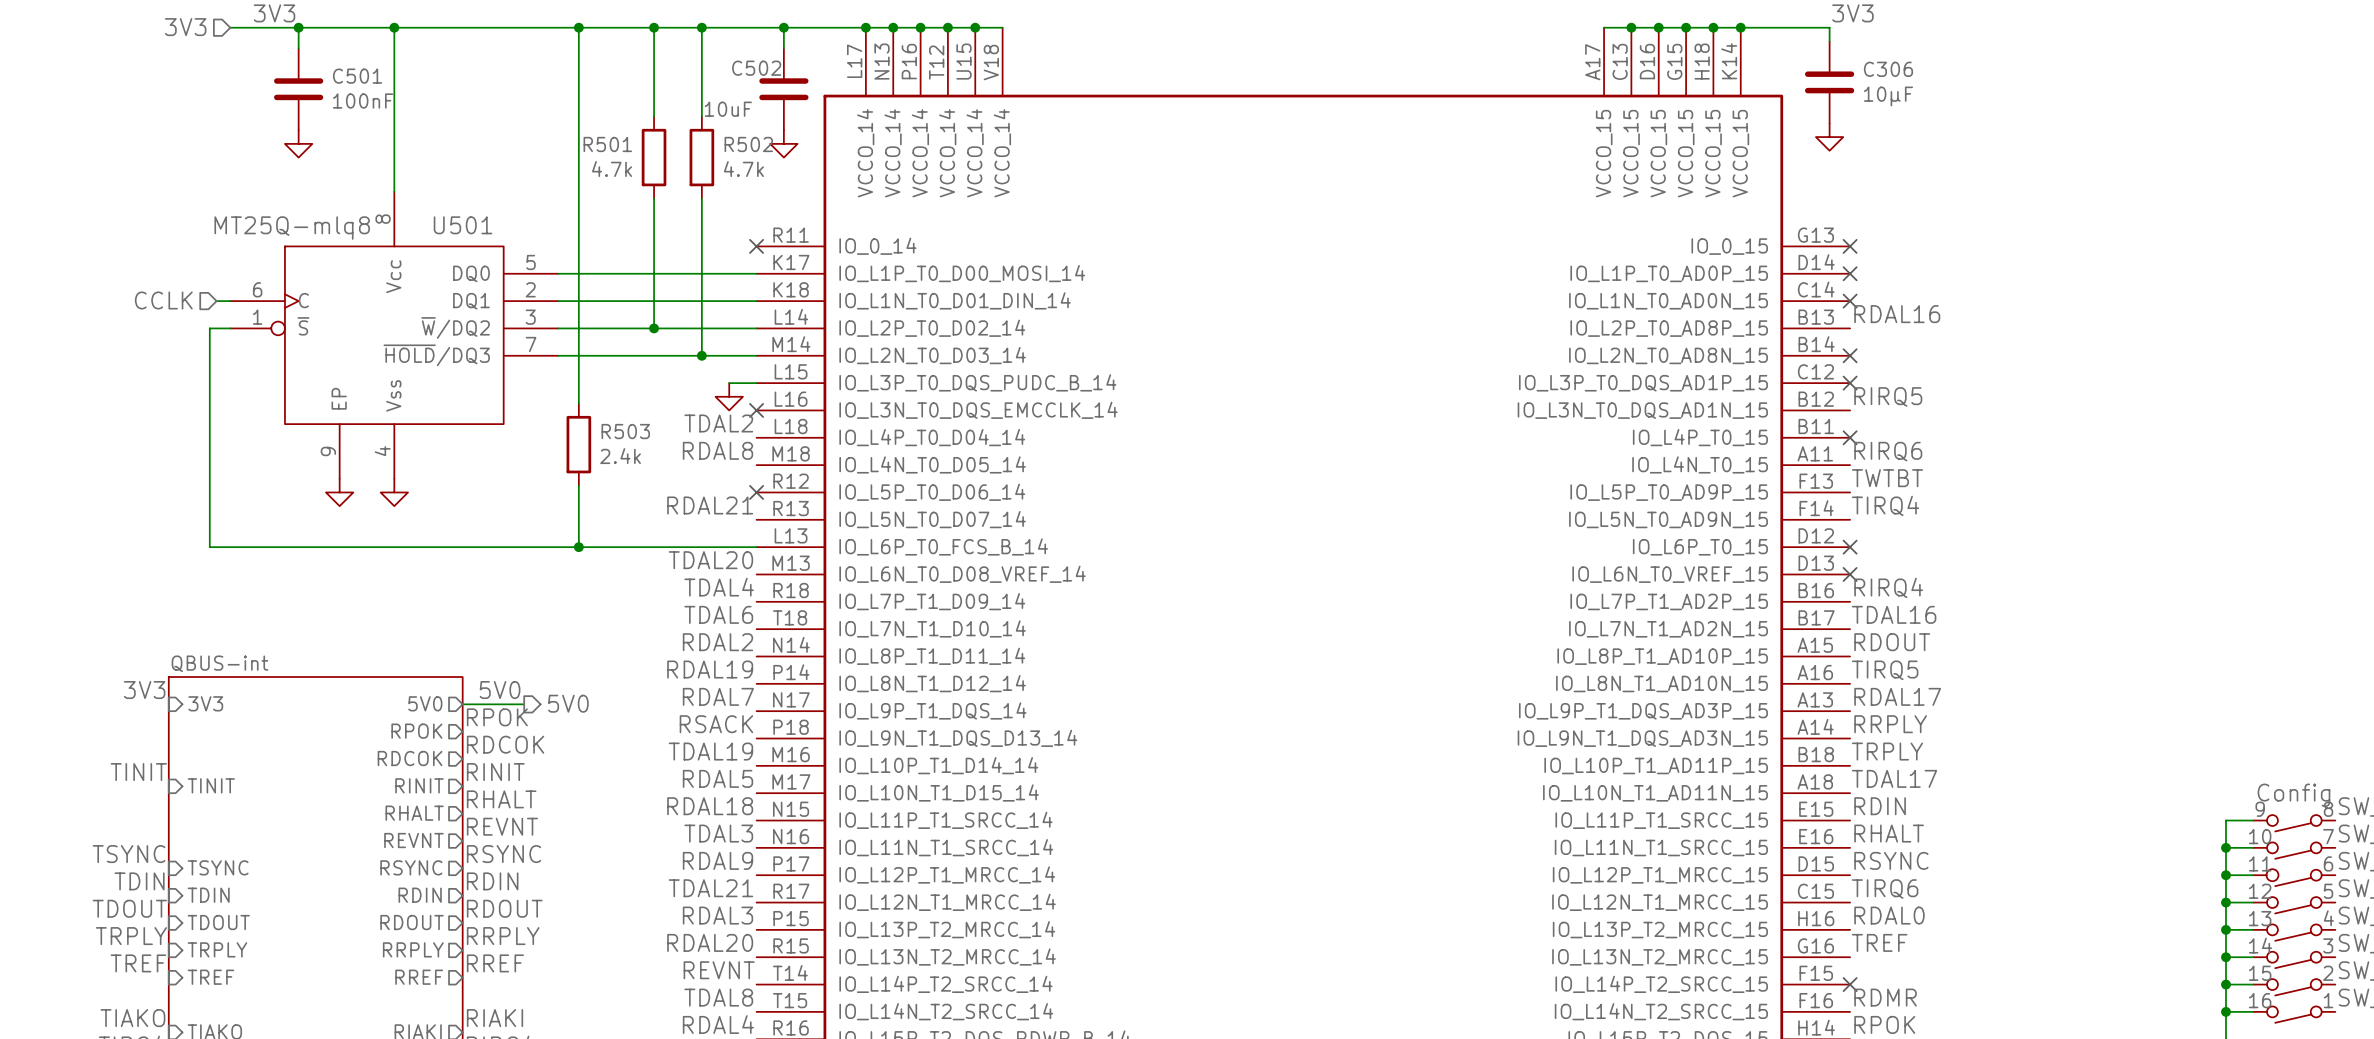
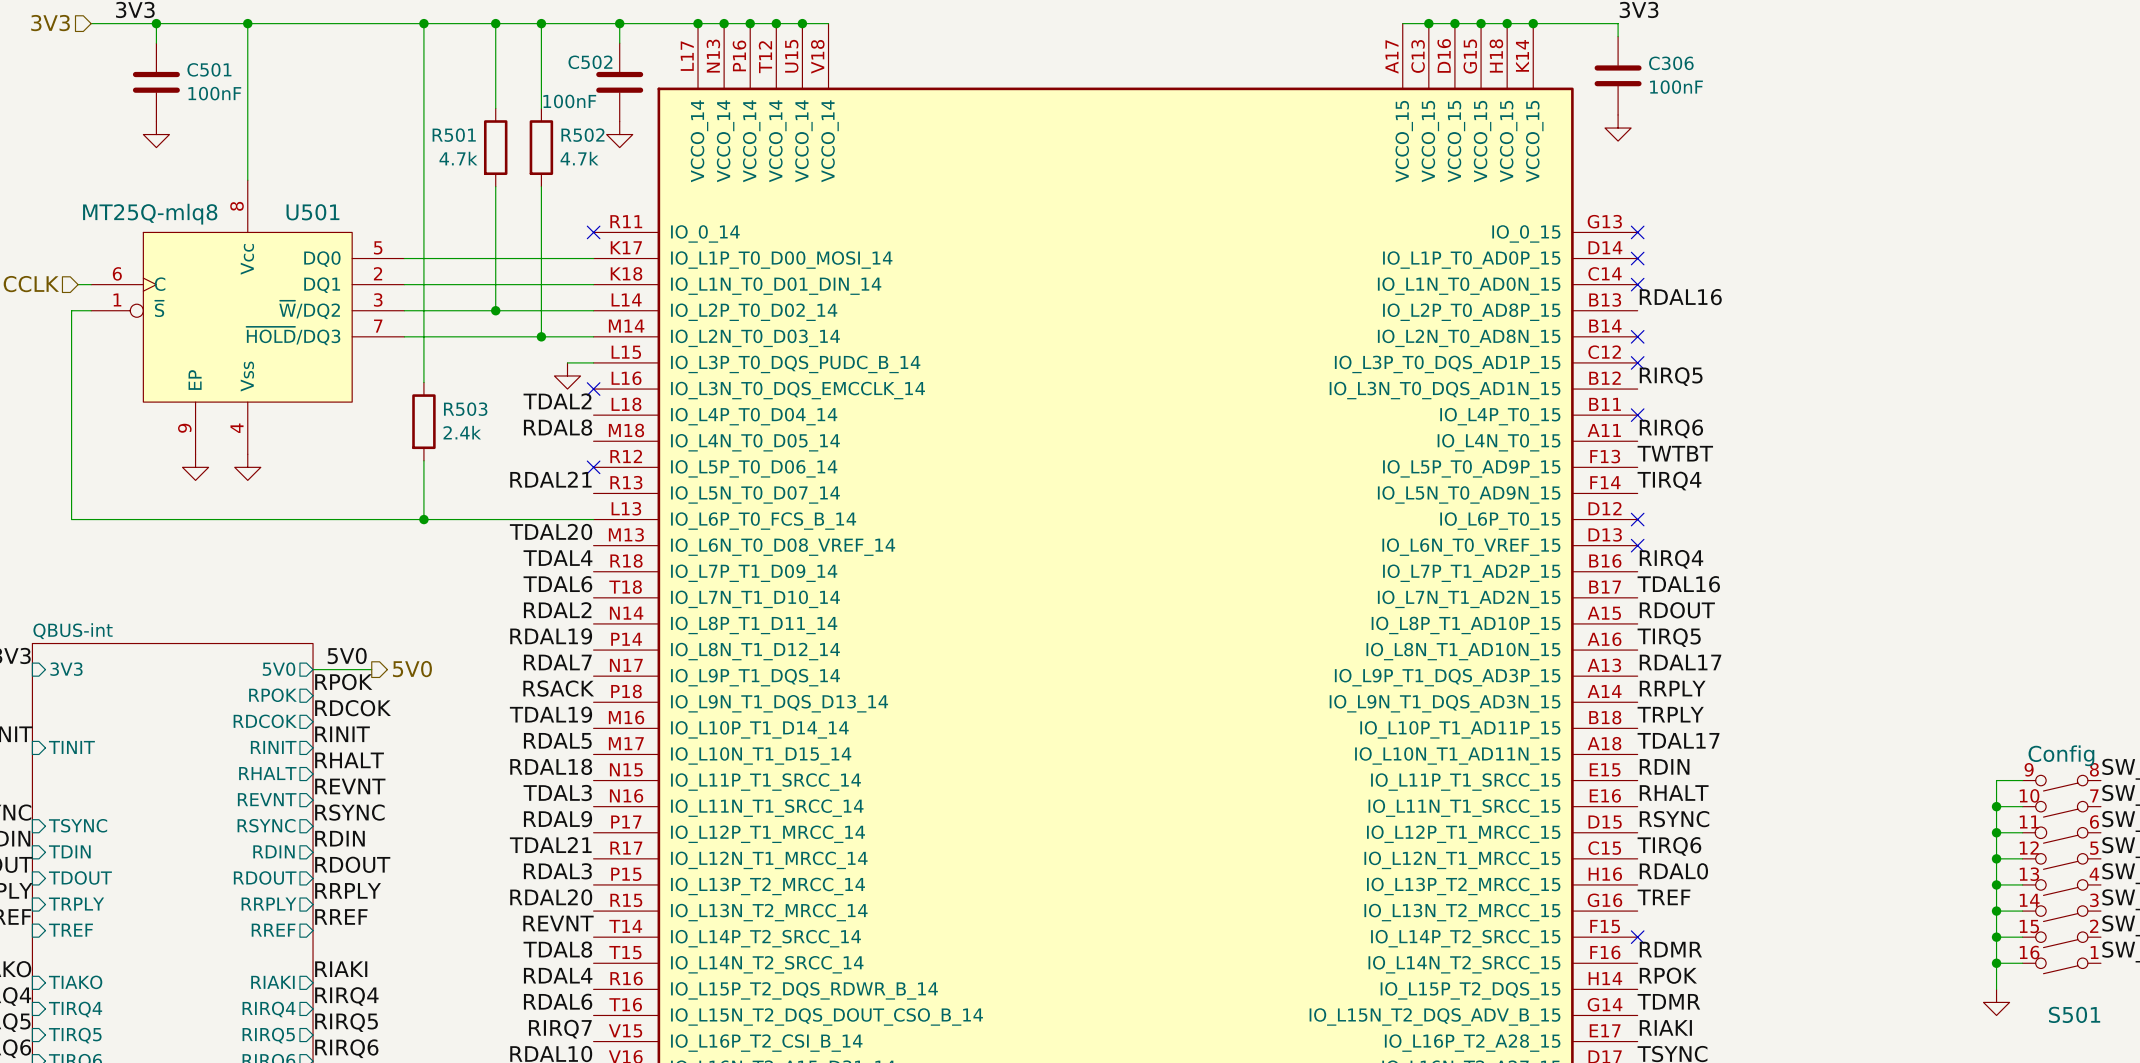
C306 value: 10µF (1888, 96) -> 100nF (1676, 87)
C502 value: 10uF (728, 109) -> 100nF (569, 101)

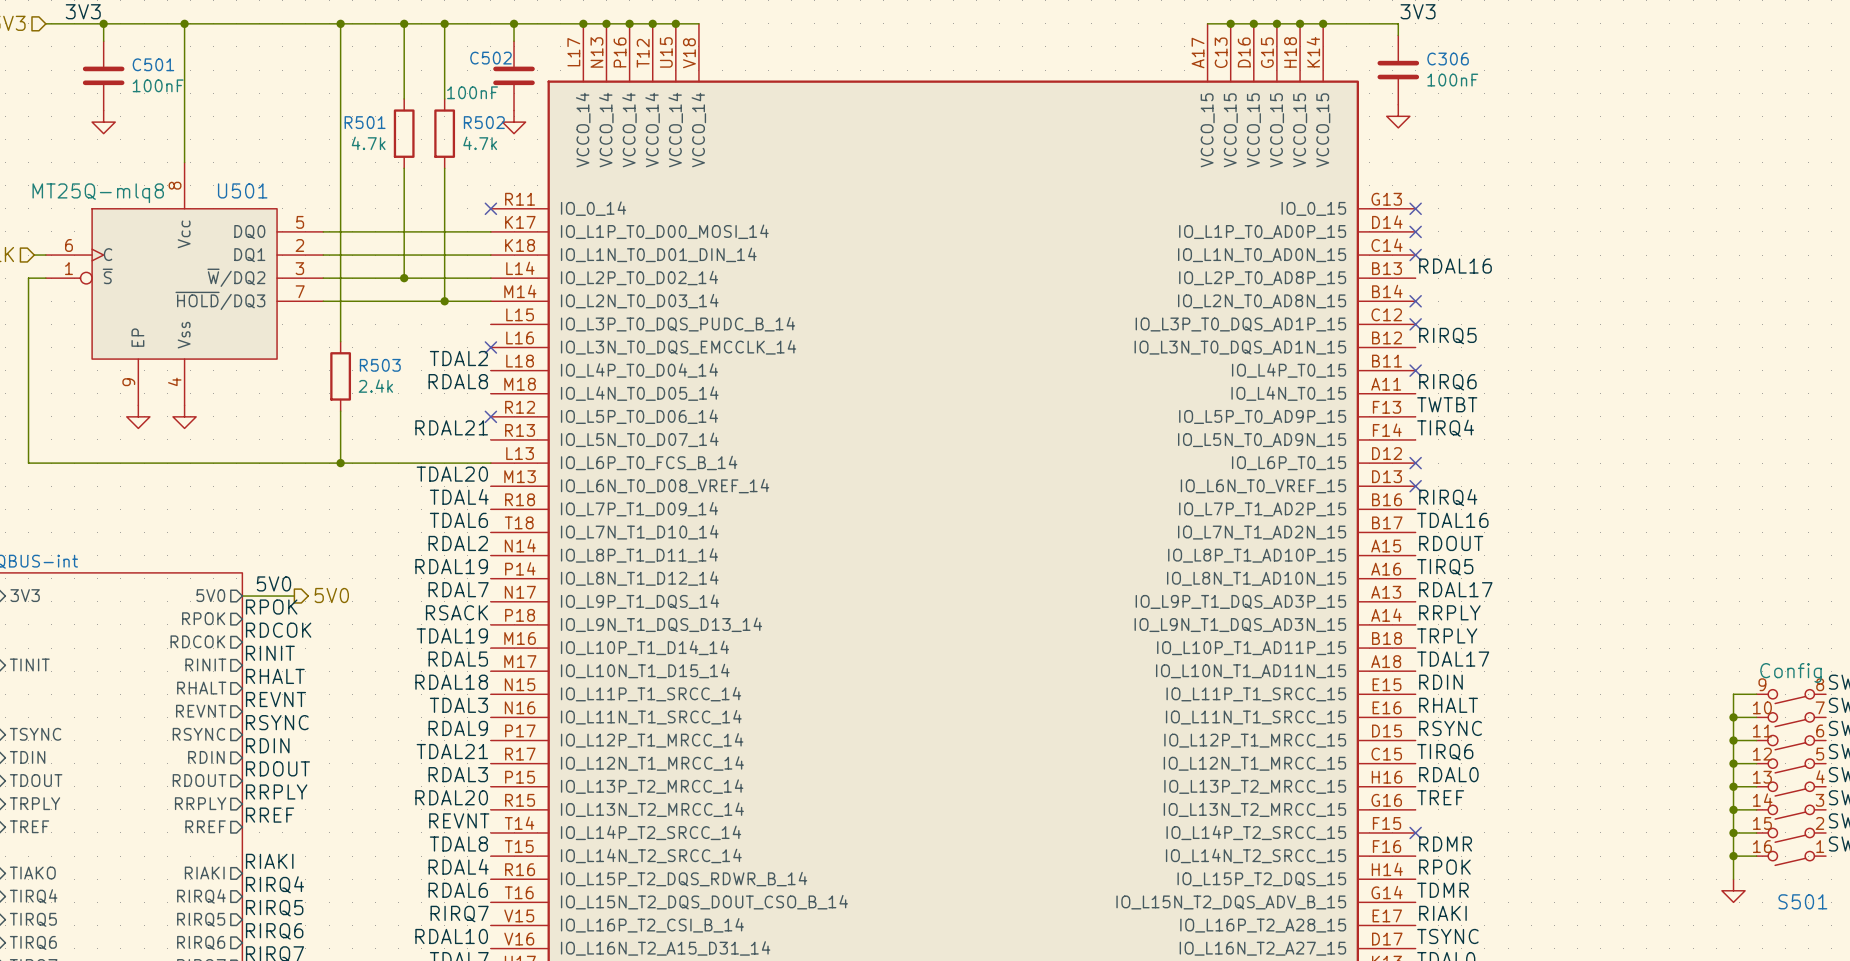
wire: (567, 362) (593, 362) -> none
power symbol: (567, 375) -> none

